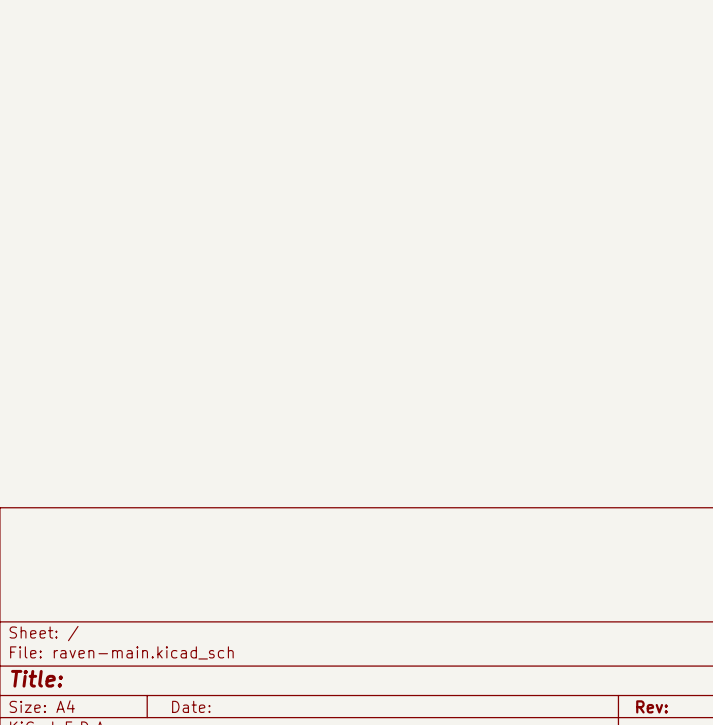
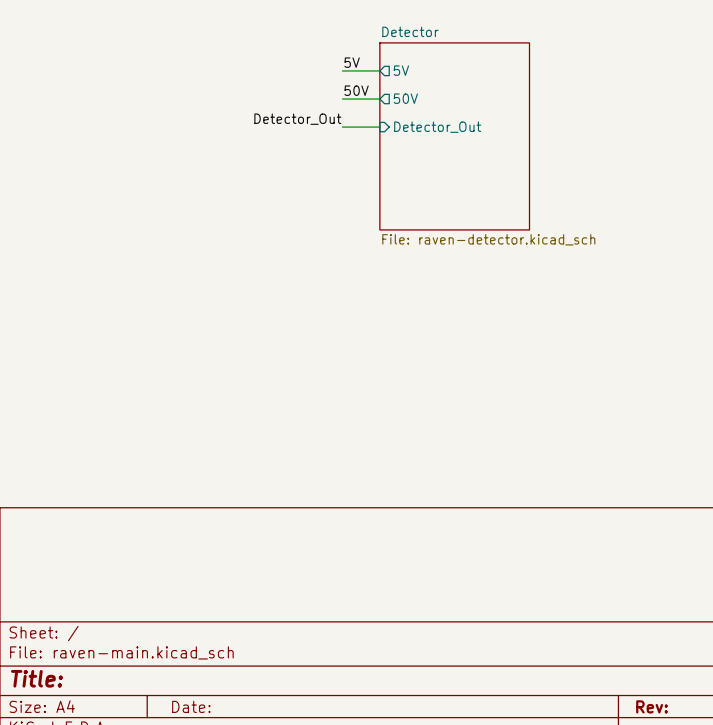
label: none -> 5V (352, 62)
wire: none -> (342, 70) (379, 70)
sheet pin: none -> 5V (401, 70)
label: none -> 50V (356, 90)
sheet pin: none -> 50V (405, 98)
wire: none -> (342, 99) (379, 99)
label: none -> Detector_Out (297, 119)
wire: none -> (342, 127) (379, 127)
sheet pin: none -> Detector_Out (437, 127)
sheet Detector: none -> File: raven-detector.kicad_sch (454, 136)

